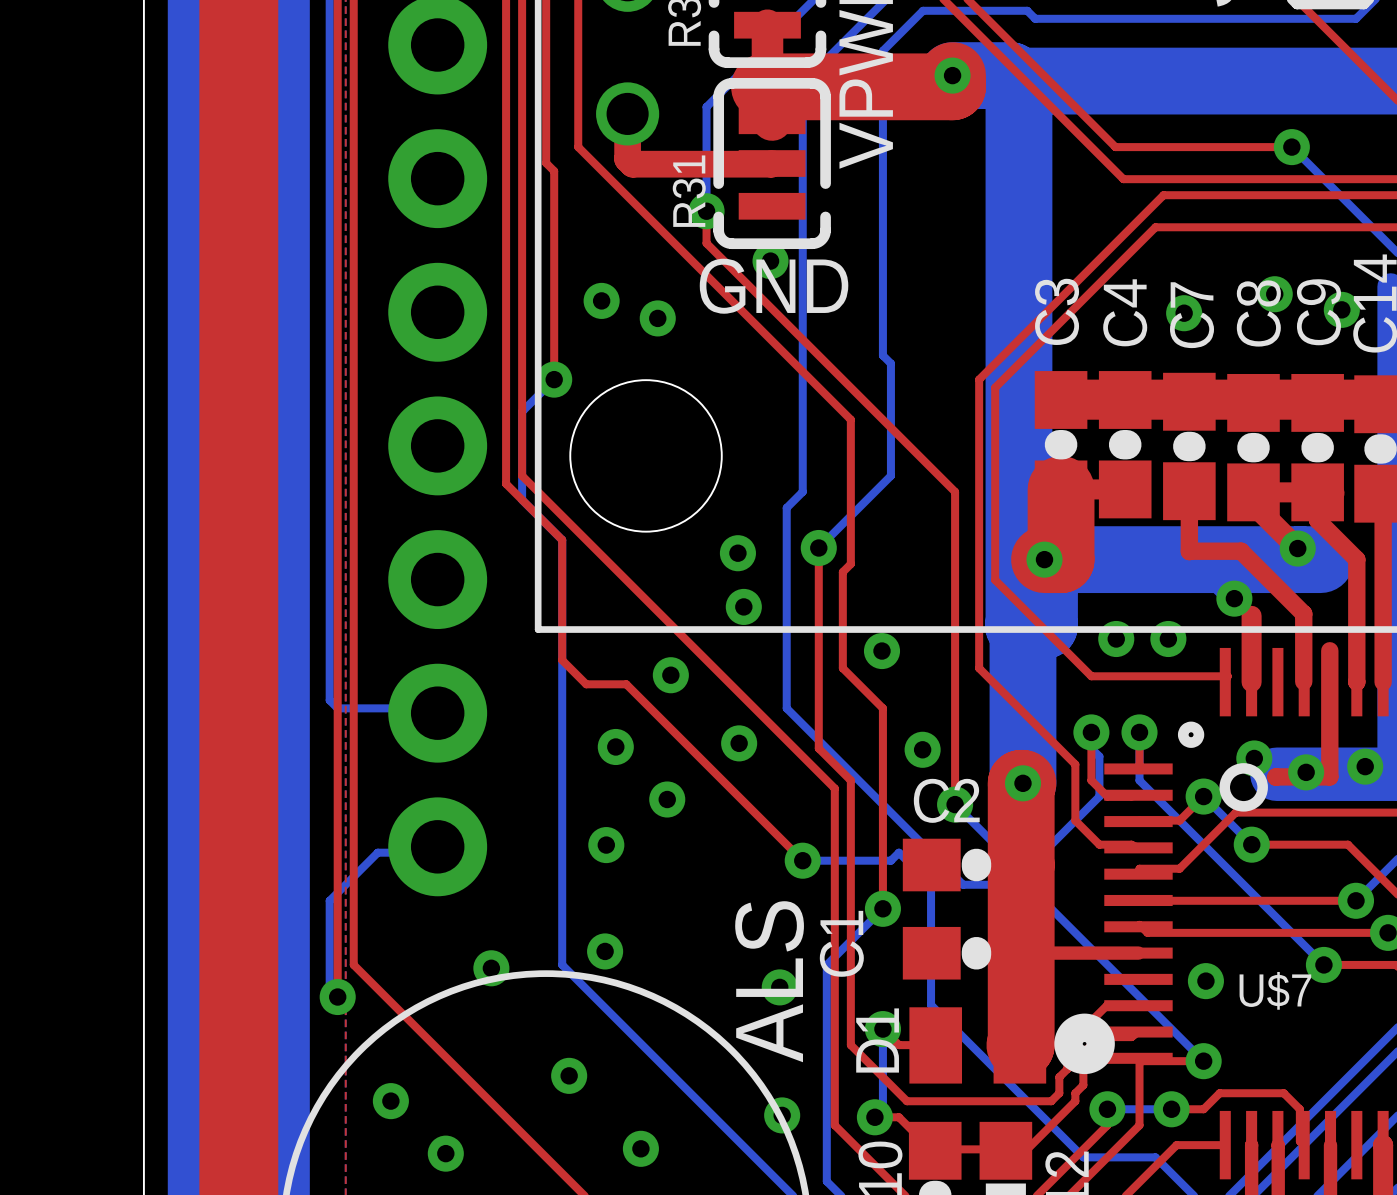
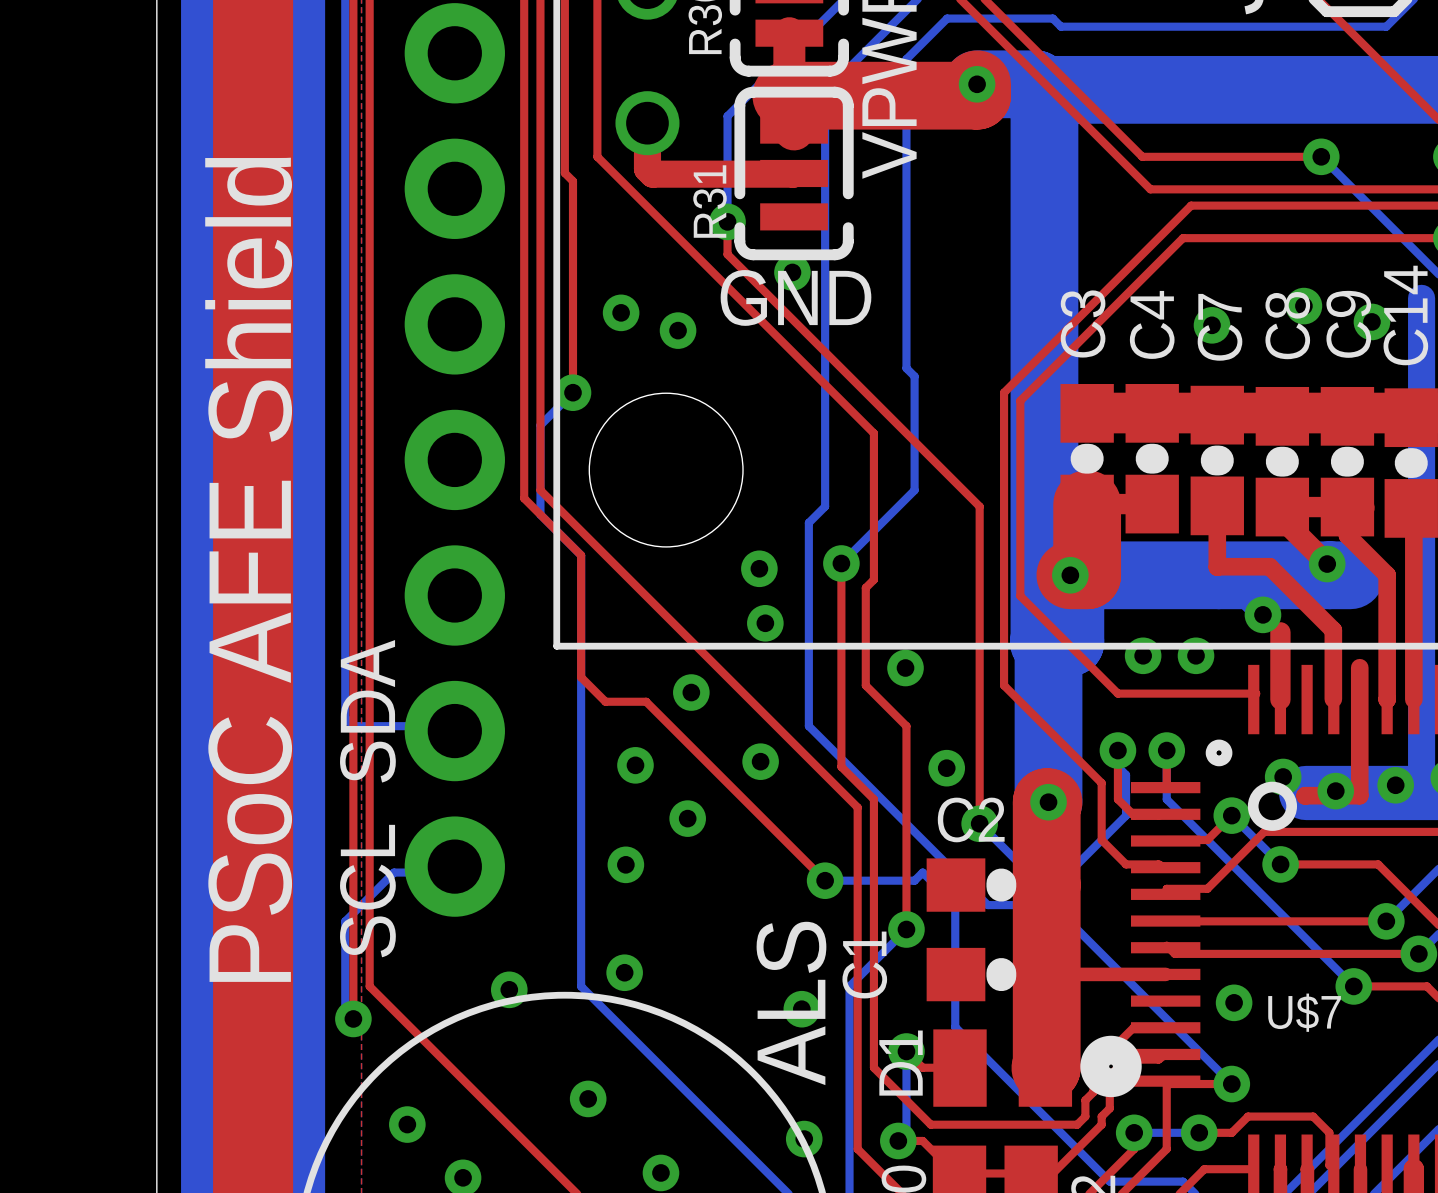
text: none -> PSoC AFE Shield (248, 569)
text: none -> SDA (367, 711)
text: none -> SCL (367, 891)

